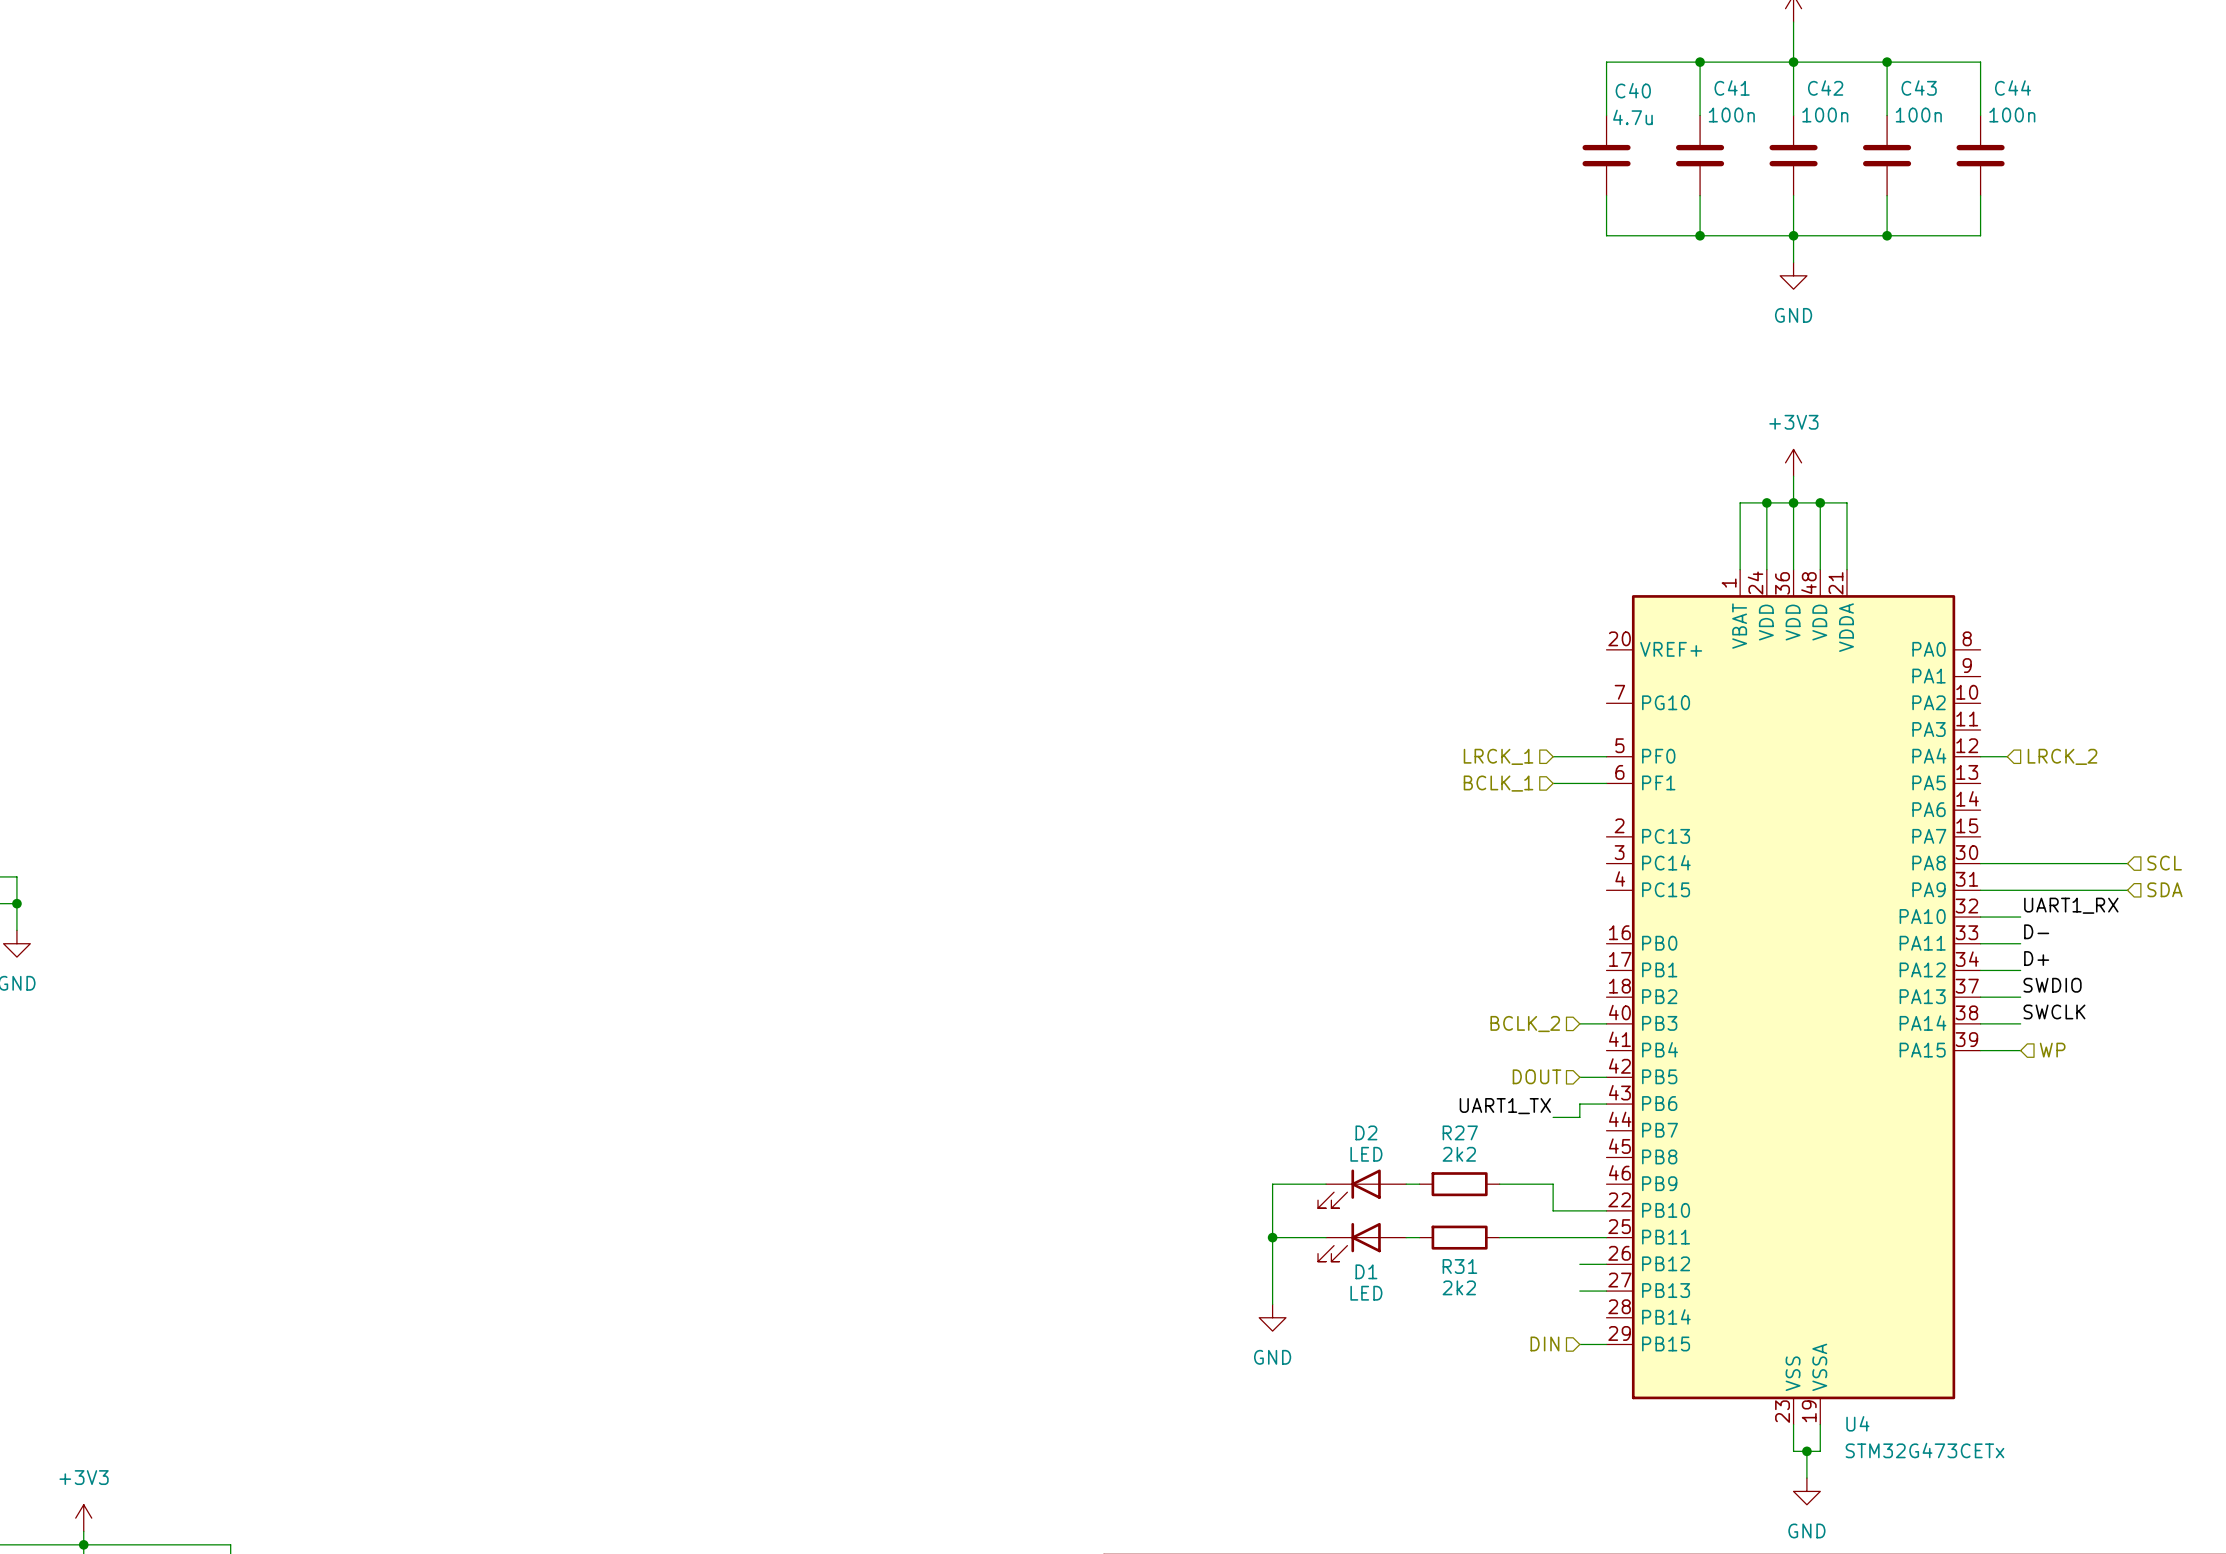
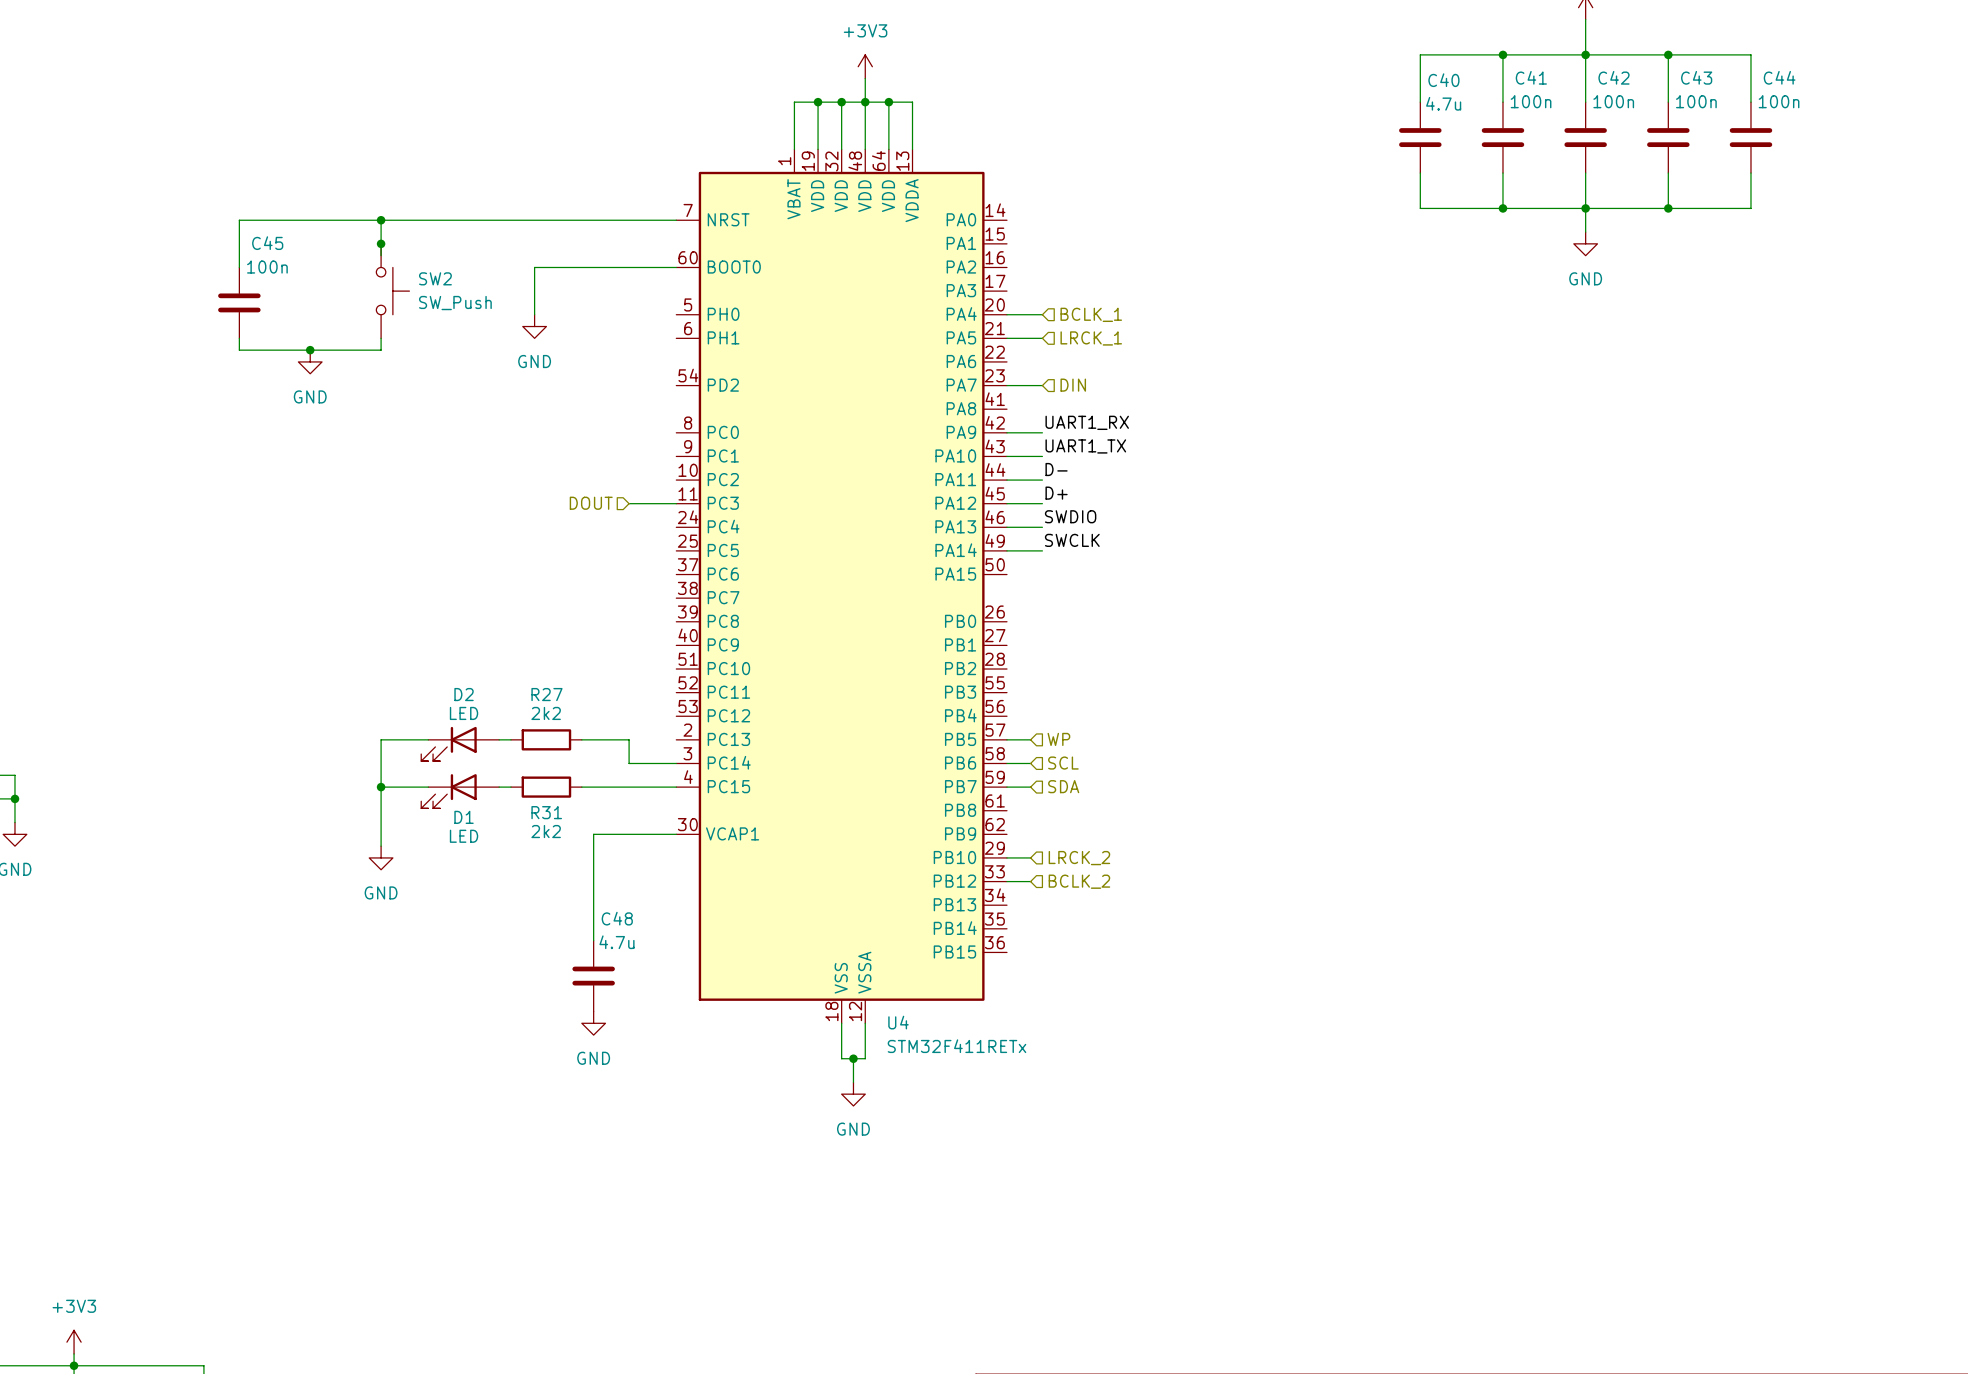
power symbol: none -> +3V3 (865, 66)
wire: none -> (865, 78) (865, 149)
wire: none -> (818, 102) (818, 149)
junction: none -> (818, 102)
wire: none -> (841, 102) (841, 149)
junction: none -> (841, 102)
junction: none -> (865, 102)
wire: none -> (888, 102) (888, 149)
junction: none -> (888, 102)
wire: none -> (794, 149) (794, 102) (912, 102) (912, 149)
wire: none -> (381, 220) (381, 255)
junction: none -> (381, 220)
wire: none -> (676, 220) (239, 220) (239, 267)
junction: none -> (381, 243)
wire: none -> (676, 267) (534, 267) (534, 314)
SW2: none -> SW_Push (392, 291)
C45: none -> 100n (239, 302)
wire: none -> (1006, 314) (1042, 314)
hierarchical label: none -> BCLK_1 (1091, 314)
power symbol: none -> GND (534, 326)
wire: none -> (239, 338) (239, 350) (381, 350) (381, 338)
wire: none -> (1006, 338) (1042, 338)
hierarchical label: none -> LRCK_1 (1091, 338)
junction: none -> (310, 350)
power symbol: none -> GND (310, 361)
hierarchical label: none -> DIN (1073, 385)
wire: none -> (1006, 385) (1042, 385)
power symbol: +3V3 (1793, 462) -> none
wire: (1793, 476) (1793, 569) -> none
label: none -> UART1_RX (1087, 422)
wire: none -> (1006, 432) (1042, 432)
wire: (1766, 502) (1766, 569) -> none
junction: (1766, 502) -> none
junction: (1793, 502) -> none
wire: (1820, 502) (1820, 569) -> none
junction: (1820, 502) -> none
label: none -> UART1_TX (1085, 446)
wire: none -> (1006, 456) (1042, 456)
label: none -> D- (1056, 469)
wire: none -> (1006, 480) (1042, 480)
label: none -> D+ (1056, 493)
hierarchical label: none -> DOUT (591, 503)
wire: none -> (629, 503) (676, 503)
wire: none -> (1006, 503) (1042, 503)
U4 symbol: [1606, 569, 1981, 1425] -> [676, 149, 1007, 1024]
wire: (1740, 569) (1740, 502) (1846, 502) (1846, 569) -> none
label: none -> SWDIO (1070, 516)
wire: none -> (1006, 527) (1042, 527)
label: none -> SWCLK (1072, 540)
wire: none -> (1006, 550) (1042, 550)
hierarchical label: LRCK_1 (1498, 756) -> none
wire: (1553, 756) (1606, 756) -> none
wire: (1980, 756) (2007, 756) -> none
hierarchical label: LRCK_2 (2062, 756) -> none
hierarchical label: BCLK_1 (1498, 783) -> none
wire: (1553, 783) (1606, 783) -> none
wire: none -> (428, 739) (381, 739) (381, 846)
wire: none -> (499, 739) (510, 739)
wire: none -> (581, 739) (629, 739) (629, 763) (676, 763)
wire: none -> (1006, 739) (1030, 739)
hierarchical label: none -> WP (1058, 739)
wire: none -> (1006, 763) (1030, 763)
hierarchical label: none -> SCL (1063, 763)
wire: (1980, 863) (2127, 863) -> none
hierarchical label: SCL (2164, 863) -> none
hierarchical label: none -> SDA (1063, 786)
hierarchical label: SDA (2164, 889) -> none
wire: none -> (381, 787) (428, 787)
junction: none -> (381, 787)
wire: none -> (499, 787) (510, 787)
wire: none -> (581, 787) (676, 787)
wire: none -> (1006, 787) (1030, 787)
wire: (1980, 890) (2127, 890) -> none
label: UART1_RX (2071, 905) -> none
wire: (1980, 917) (2020, 917) -> none
label: D- (2036, 931) -> none
wire: none -> (676, 834) (593, 834) (593, 940)
wire: (1980, 943) (2020, 943) -> none
label: D+ (2036, 958) -> none
power symbol: none -> GND (381, 857)
wire: none -> (1006, 857) (1030, 857)
hierarchical label: none -> LRCK_2 (1079, 858)
wire: (1980, 970) (2020, 970) -> none
label: SWDIO (2052, 985) -> none
wire: none -> (1006, 881) (1030, 881)
hierarchical label: none -> BCLK_2 (1079, 881)
wire: (1980, 997) (2020, 997) -> none
label: SWCLK (2054, 1011) -> none
wire: (1579, 1023) (1606, 1023) -> none
wire: (1980, 1023) (2020, 1023) -> none
hierarchical label: BCLK_2 (1525, 1024) -> none
wire: (1980, 1050) (2020, 1050) -> none
hierarchical label: WP (2052, 1050) -> none
hierarchical label: DOUT (1537, 1076) -> none
wire: (1579, 1077) (1606, 1077) -> none
C48: none -> 4.7u (593, 976)
wire: (1606, 1104) (1579, 1104) (1579, 1117) (1553, 1117) -> none
label: UART1_TX (1505, 1106) -> none
power symbol: none -> GND (593, 1023)
wire: none -> (841, 1023) (841, 1058) (865, 1058) (865, 1023)
wire: (1326, 1184) (1272, 1184) (1272, 1304) -> none
wire: (1406, 1184) (1419, 1184) -> none
R27 position: (1459, 1184) -> (546, 739)
wire: (1499, 1184) (1553, 1184) (1553, 1210) (1606, 1210) -> none
D2 position: (1362, 1188) -> (460, 744)
wire: none -> (853, 1058) (853, 1082)
junction: none -> (853, 1058)
power symbol: none -> GND (853, 1094)
wire: (1272, 1237) (1326, 1237) -> none
junction: (1272, 1237) -> none
wire: (1406, 1237) (1419, 1237) -> none
R31 position: (1459, 1237) -> (546, 787)
wire: (1499, 1237) (1606, 1237) -> none
D1 position: (1362, 1242) -> (460, 791)
wire: (1579, 1264) (1606, 1264) -> none
wire: (1579, 1291) (1606, 1291) -> none
power symbol: GND (1272, 1317) -> none
hierarchical label: DIN (1544, 1343) -> none
wire: (1579, 1344) (1606, 1344) -> none
U4 name position: U4 (1857, 1423) -> U4 (898, 1022)
wire: (1793, 1424) (1793, 1451) (1820, 1451) (1820, 1424) -> none
U4 value: STM32G473CETx (1924, 1450) -> STM32F411RETx (956, 1046)
wire: (1806, 1451) (1806, 1478) -> none
junction: (1806, 1451) -> none
power symbol: GND (1806, 1491) -> none

